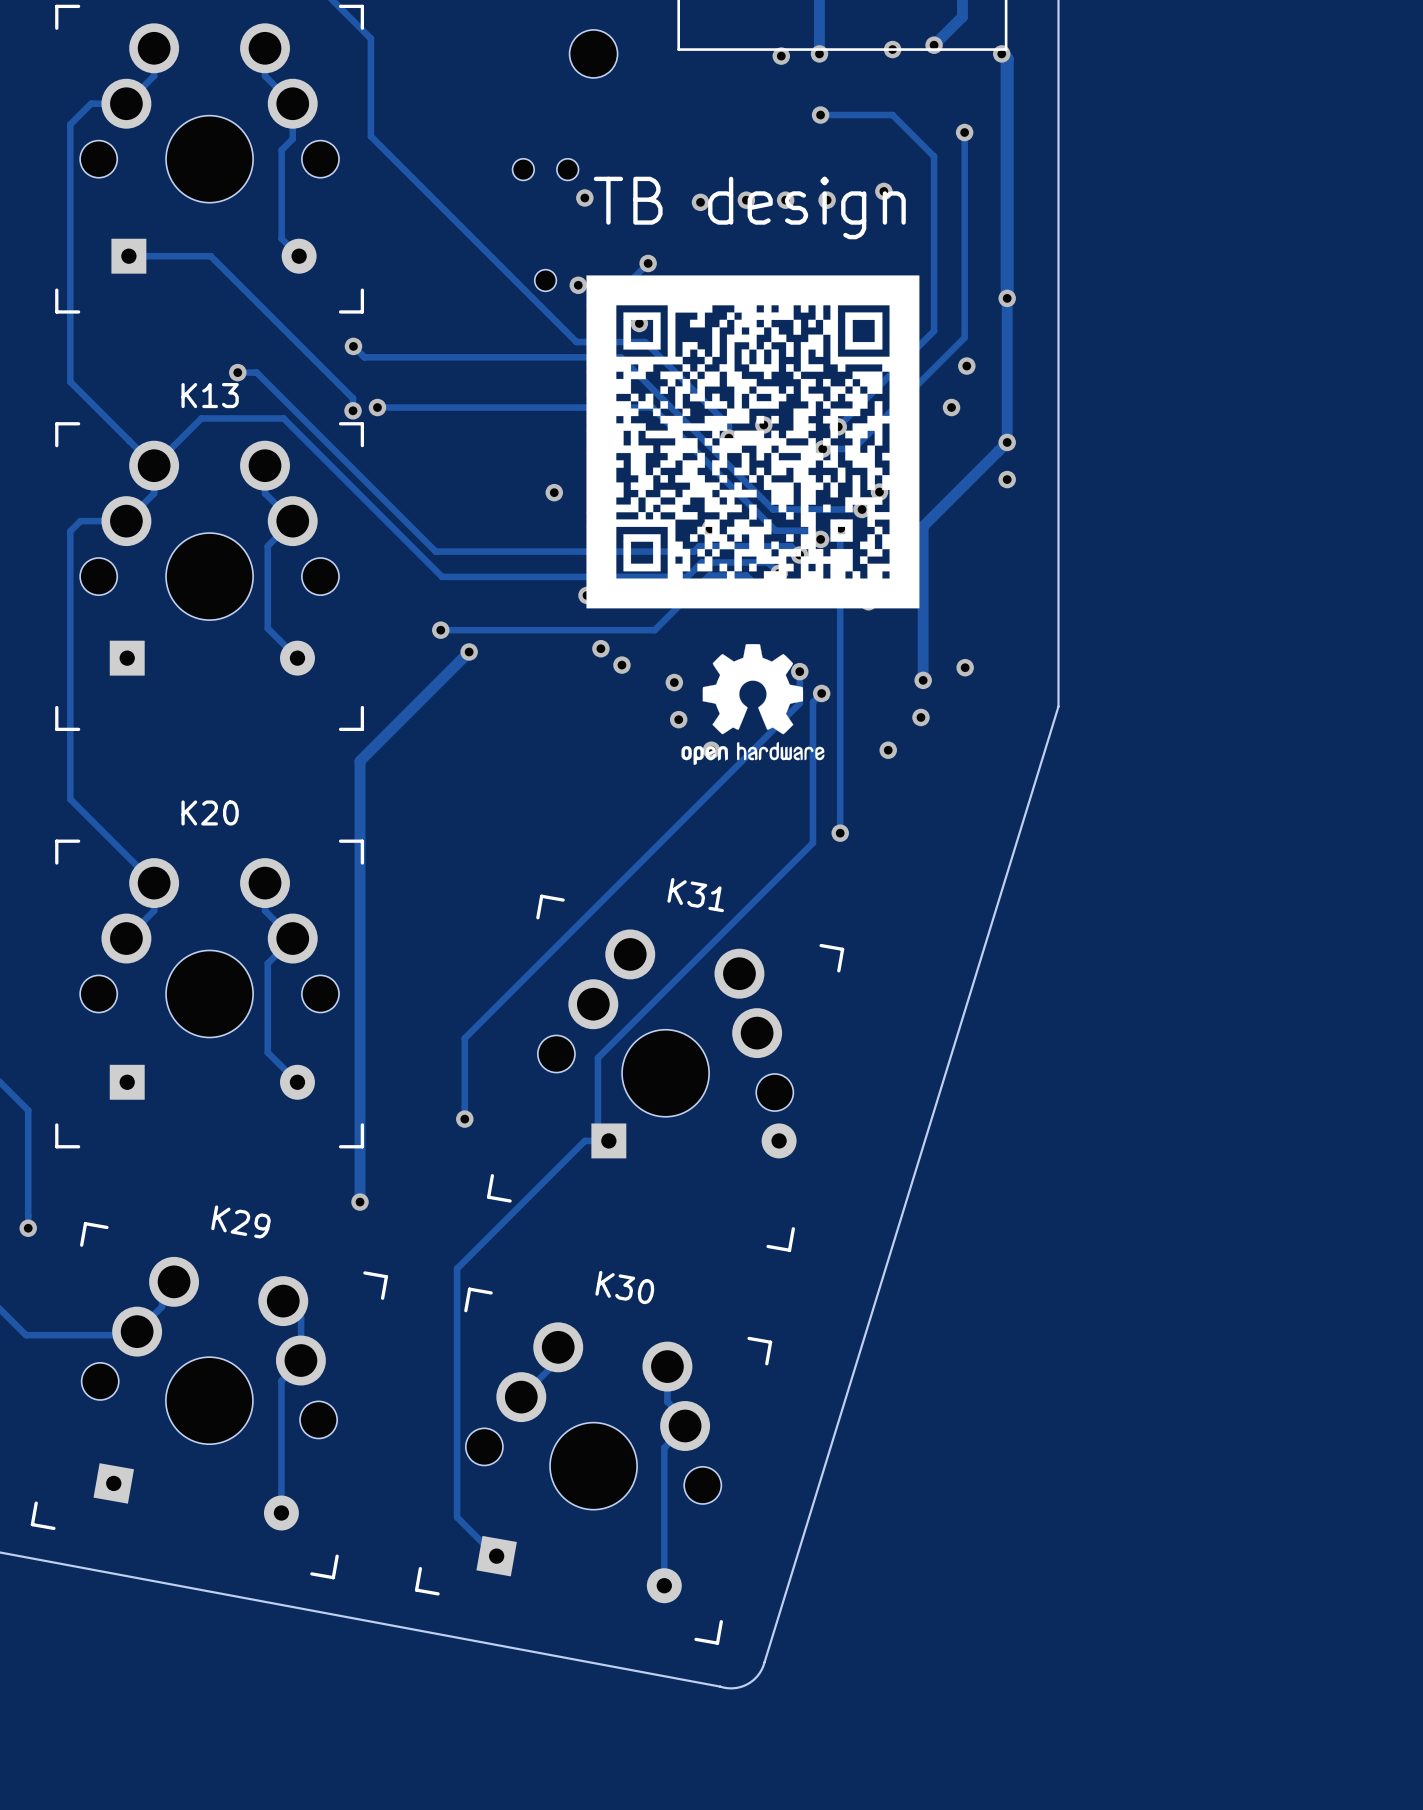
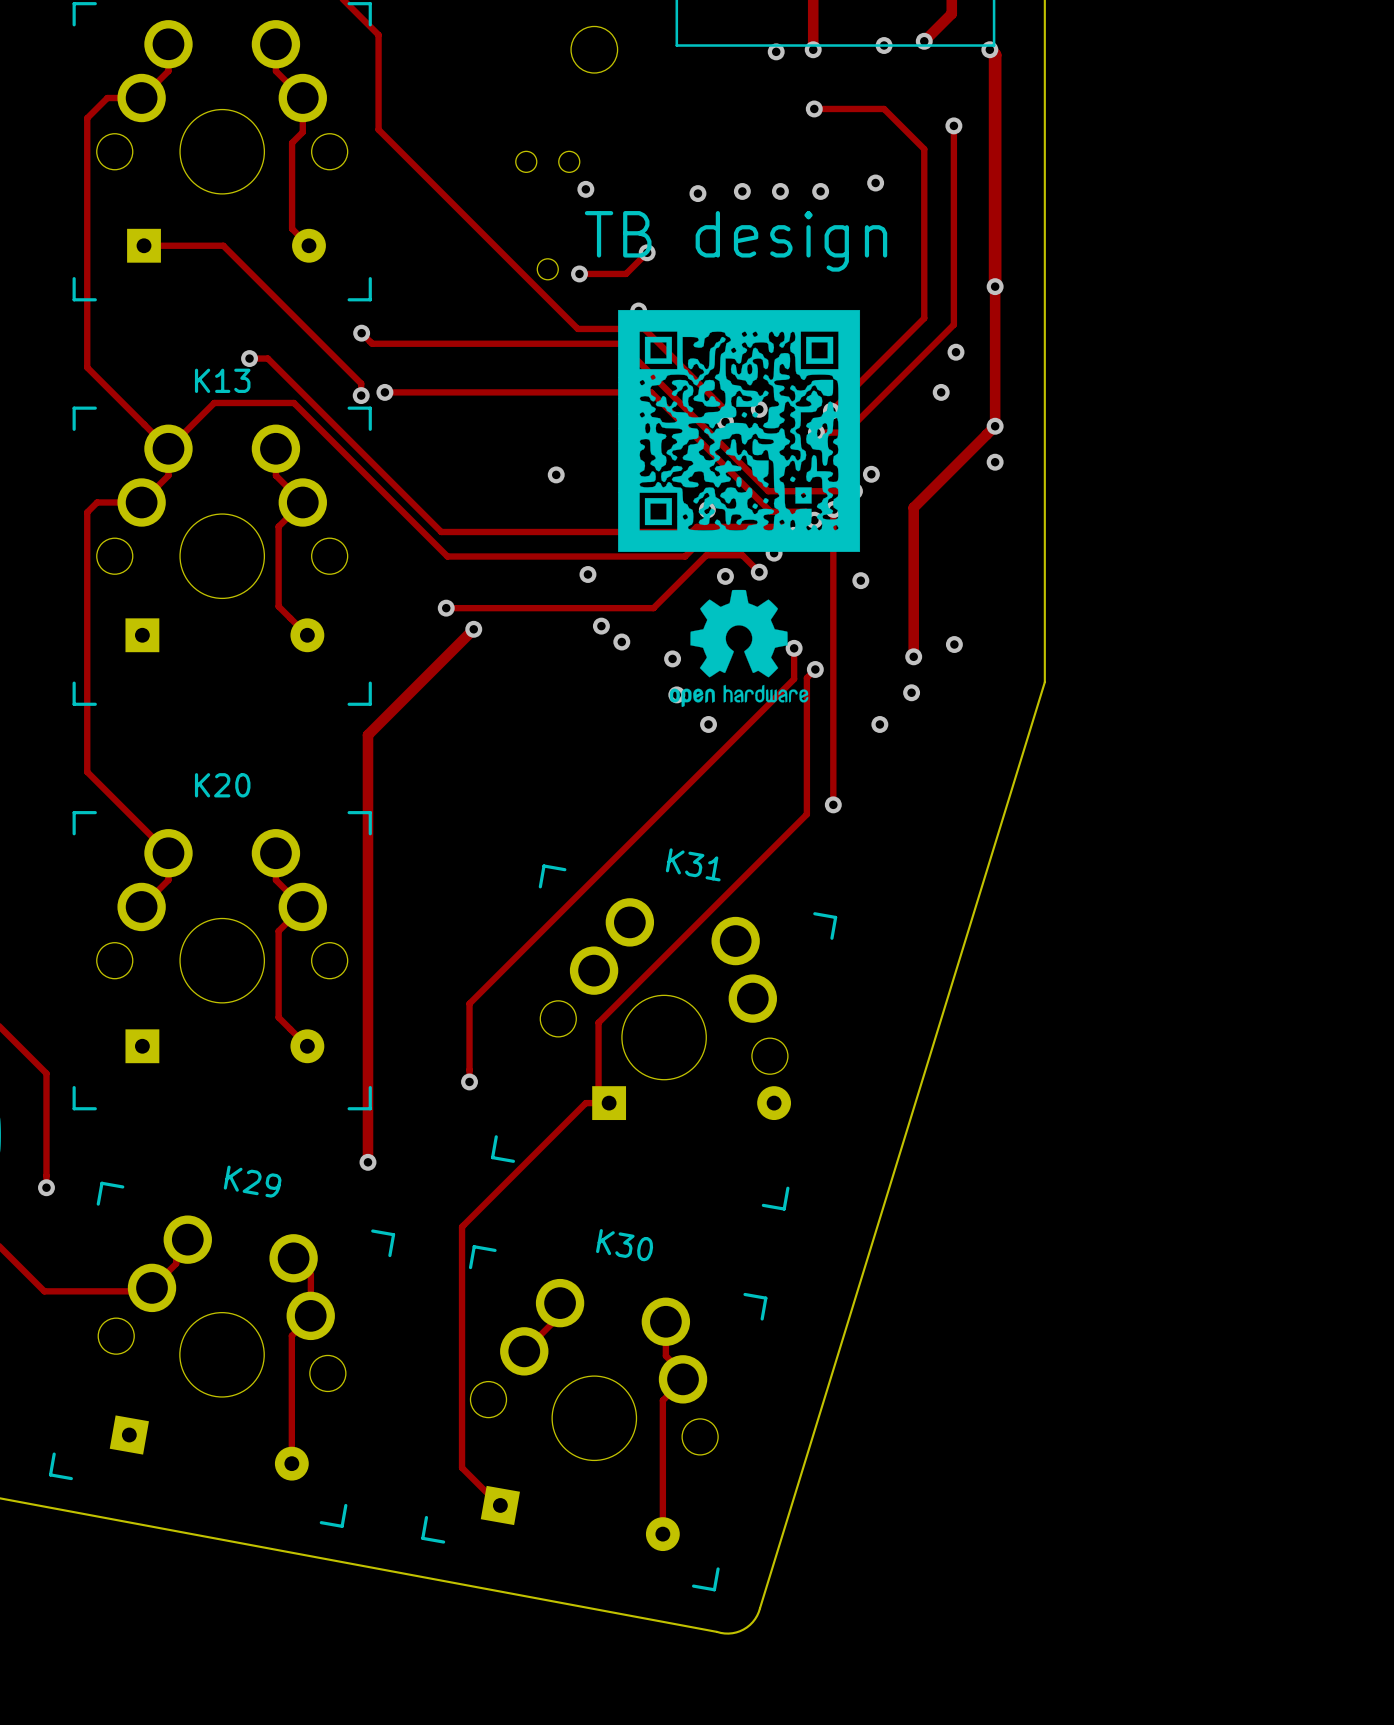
text position: TB design (749, 207) -> TB design (736, 241)
drawing shape: [586, 275, 920, 609] -> [618, 309, 861, 552]
drawing position: (752, 704) -> (739, 648)

